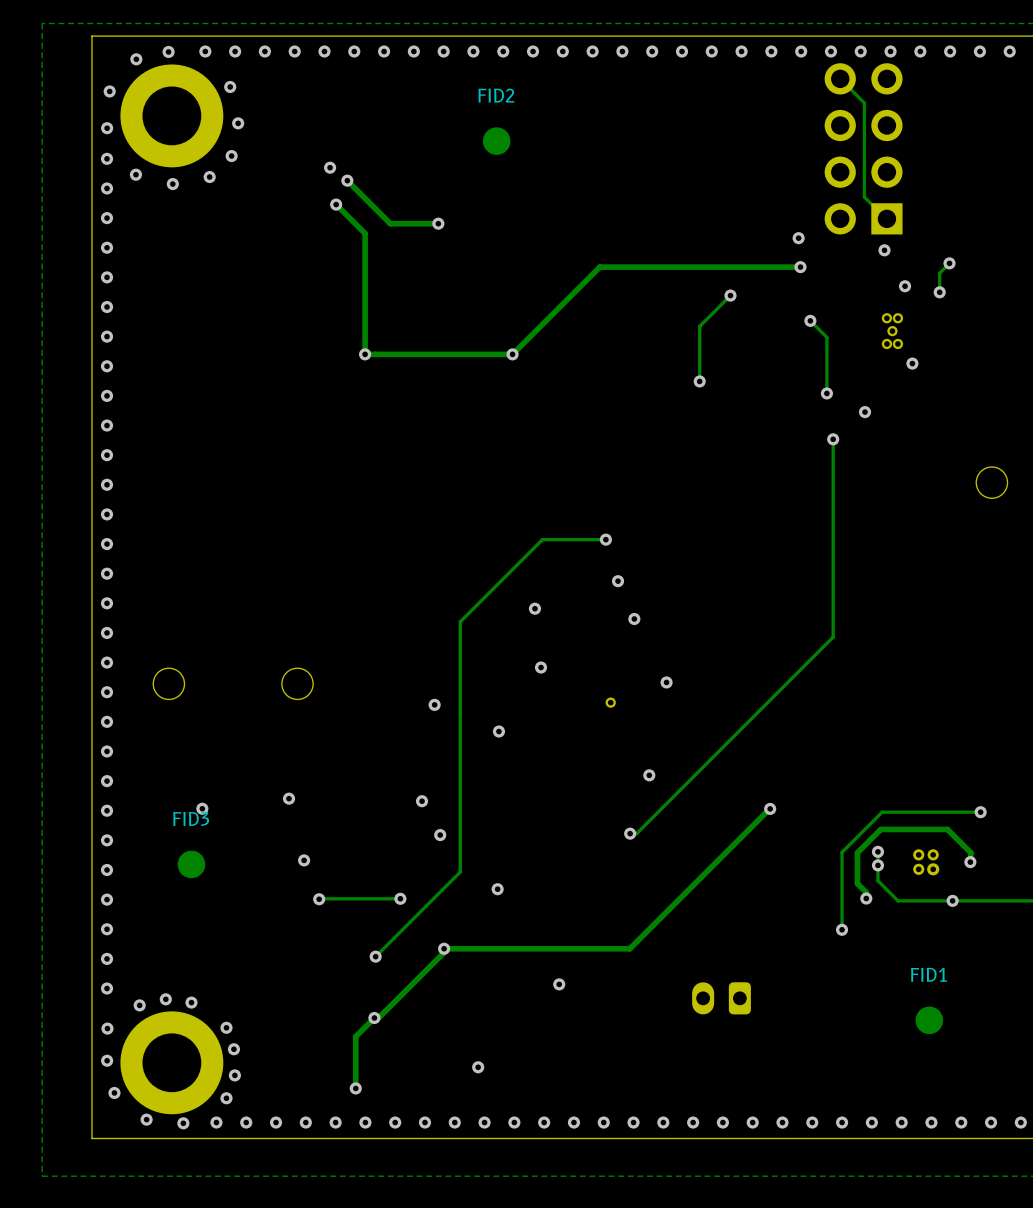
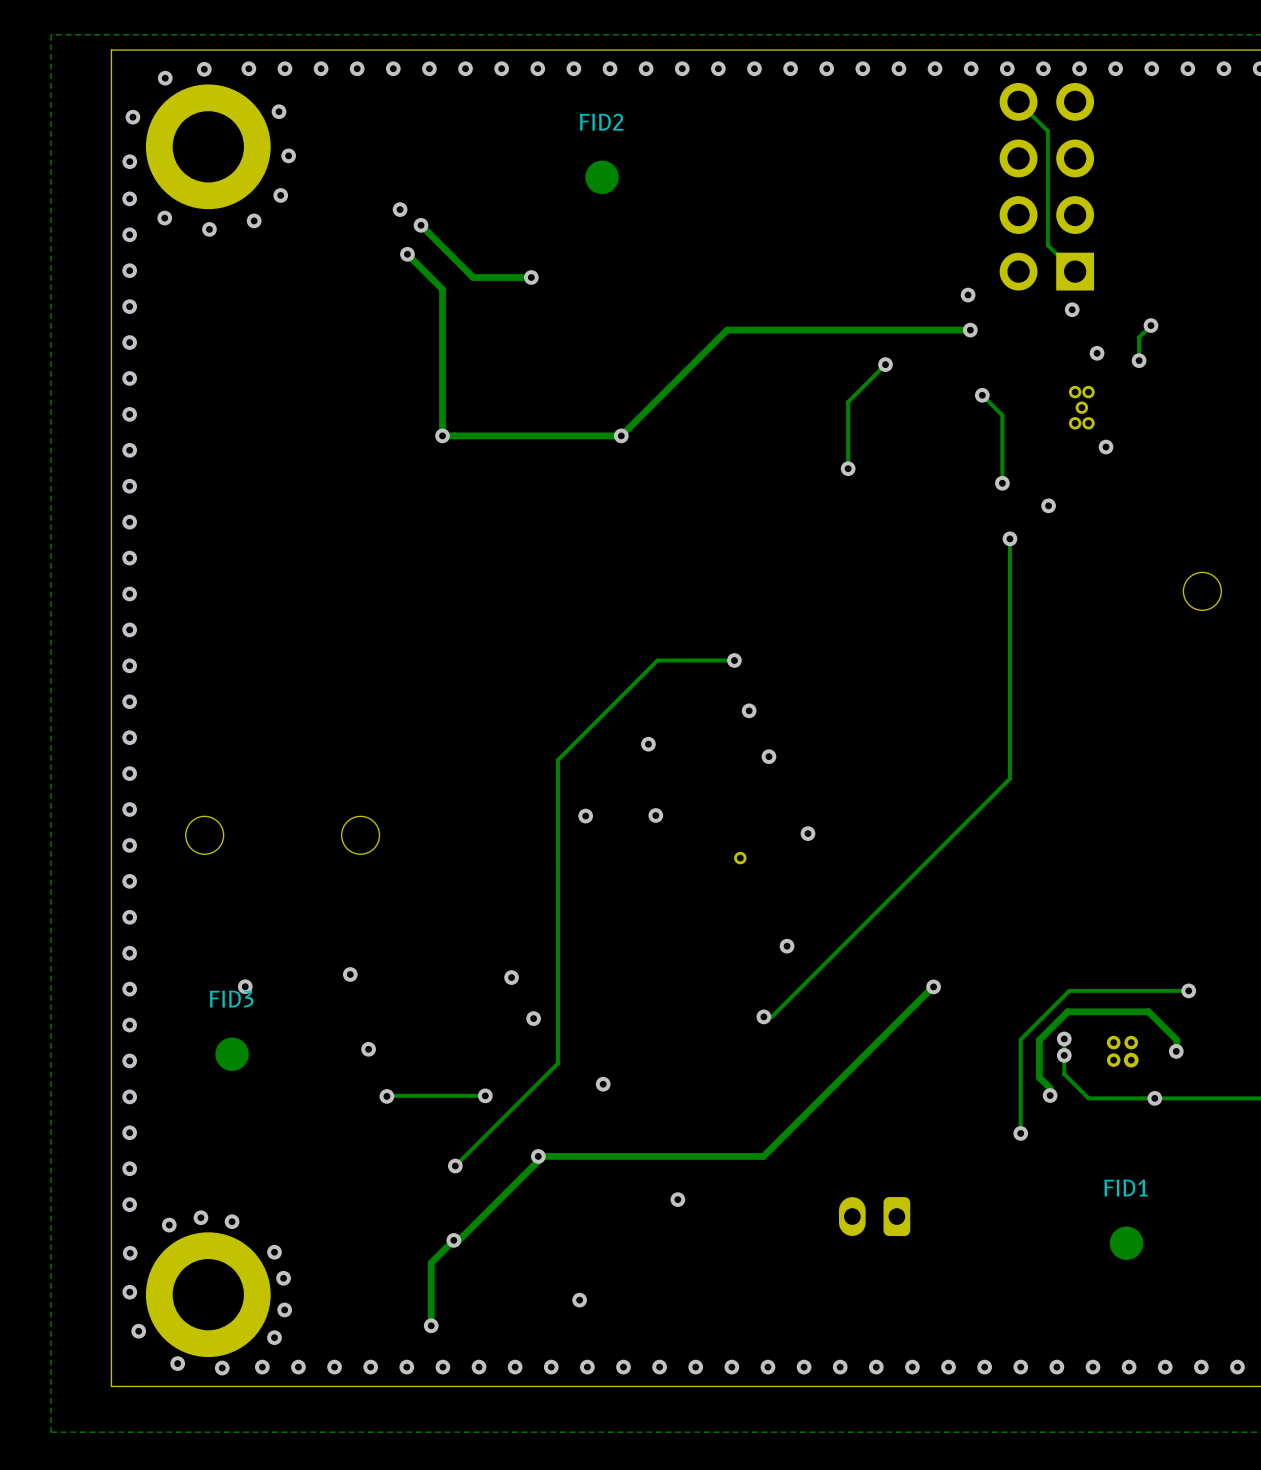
via: none -> (585, 816)
via: (434, 704) -> none
via: (498, 731) -> none

